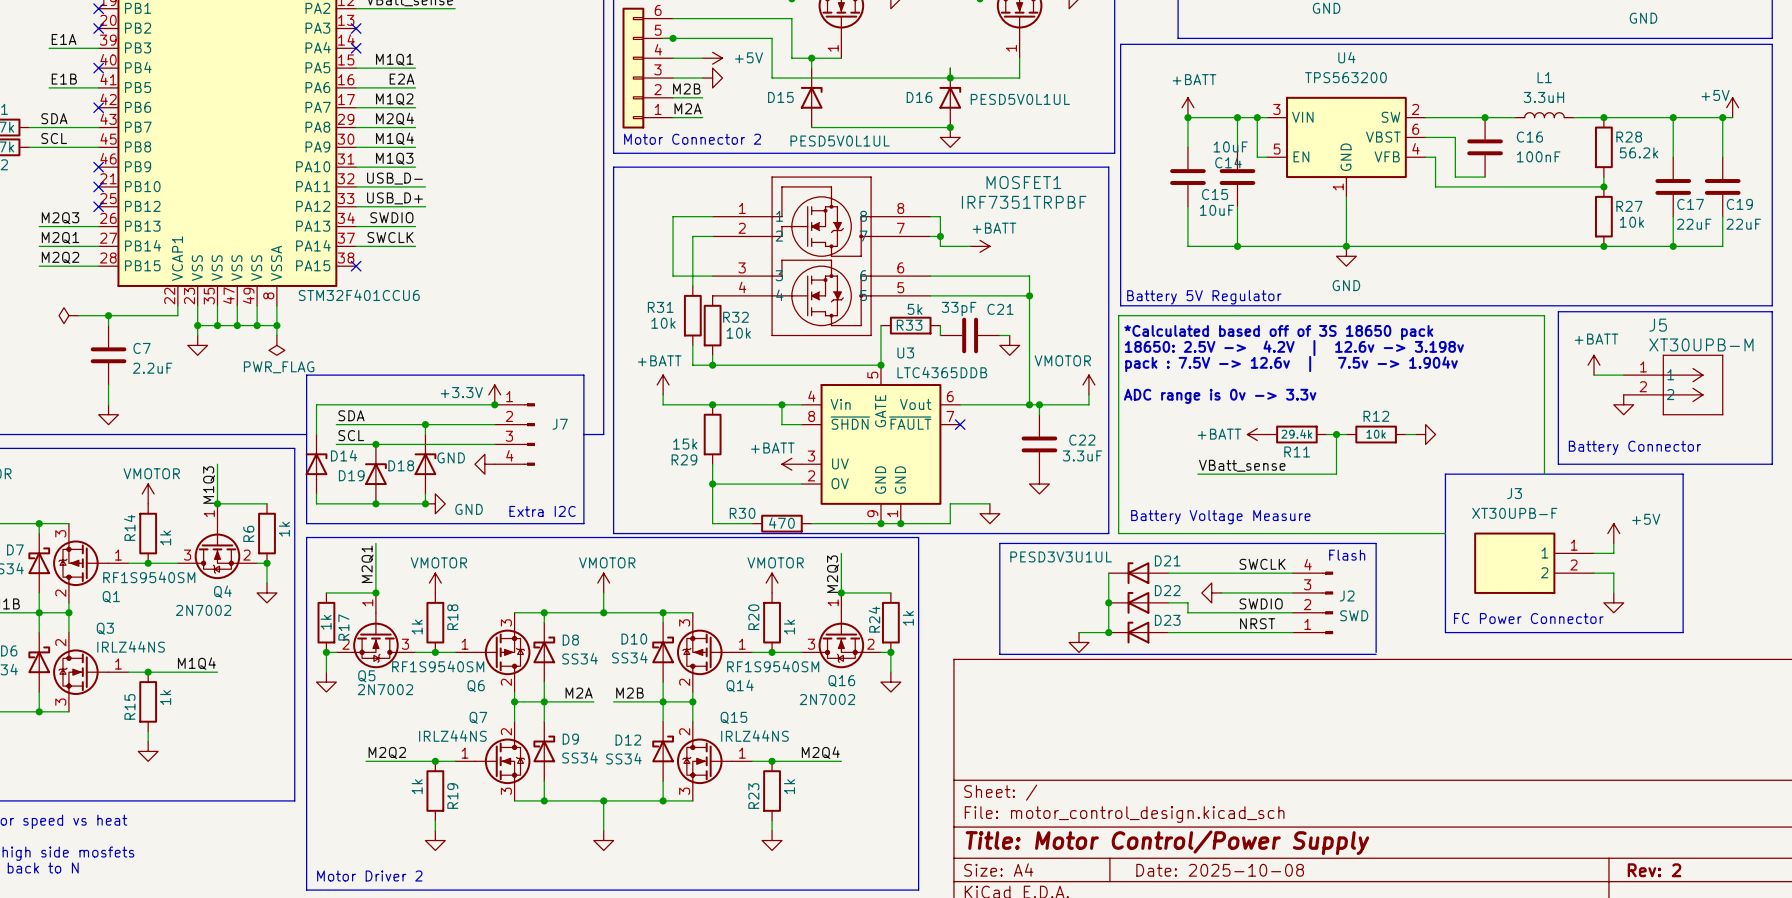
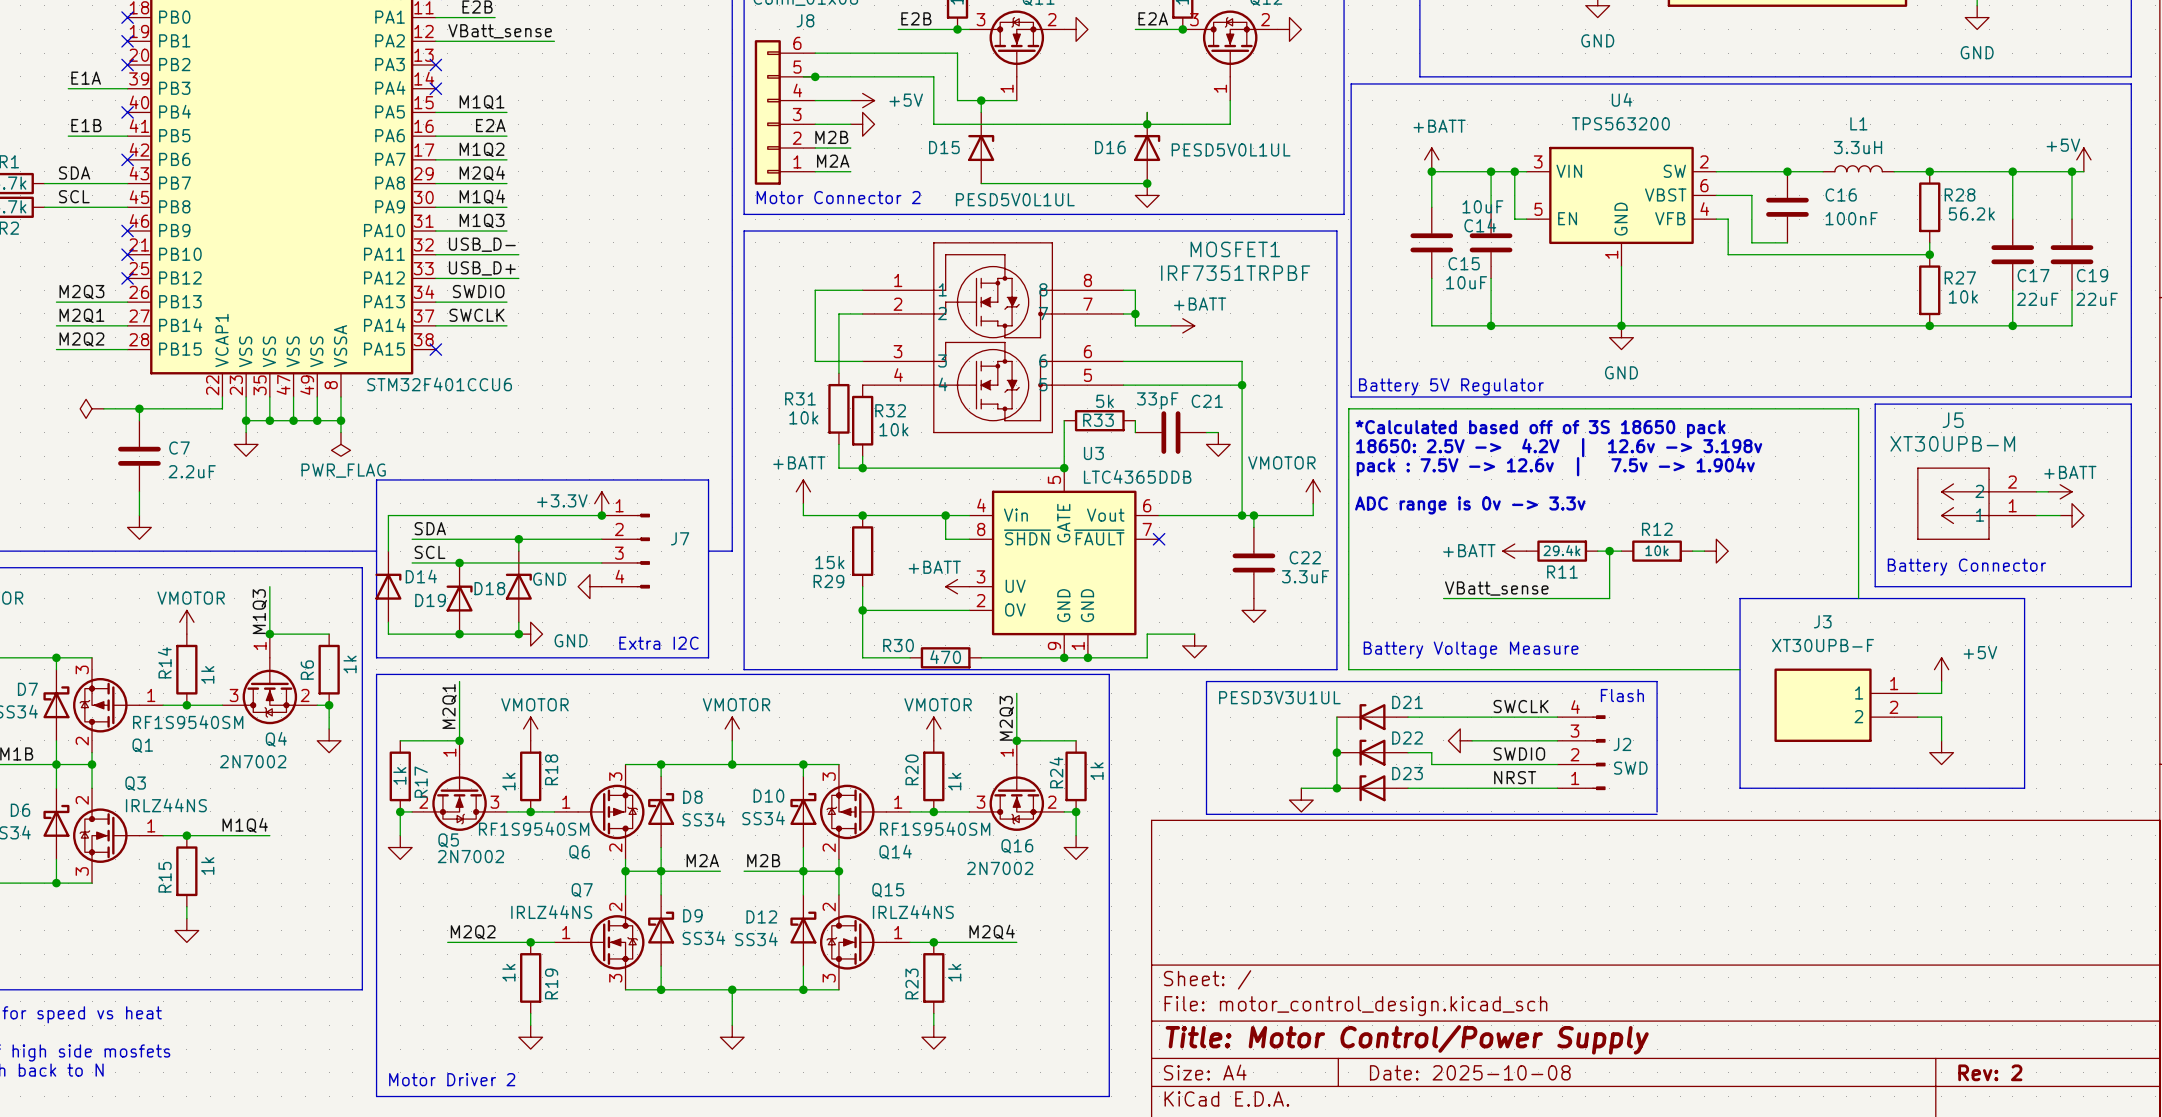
J5 value position: XT30UPB-M (1701, 344) -> XT30UPB-M (1952, 443)
power symbol rotation: 0° (1593, 365) -> 90° clockwise (2060, 491)
power symbol position: +BATT (1593, 365) -> +BATT (2060, 491)
wire: (1593, 375) (1623, 375) -> none
wire: none -> (2036, 491) (2048, 491)
J5 rotation: 0° (1693, 385) -> 180° (1953, 503)
power symbol rotation: 0° (1623, 404) -> 90° counterclockwise (2072, 515)
power symbol position: (1623, 404) -> (2072, 515)
wire: none -> (2036, 515) (2060, 515)
text: FC Power Connector (1528, 618) -> none

